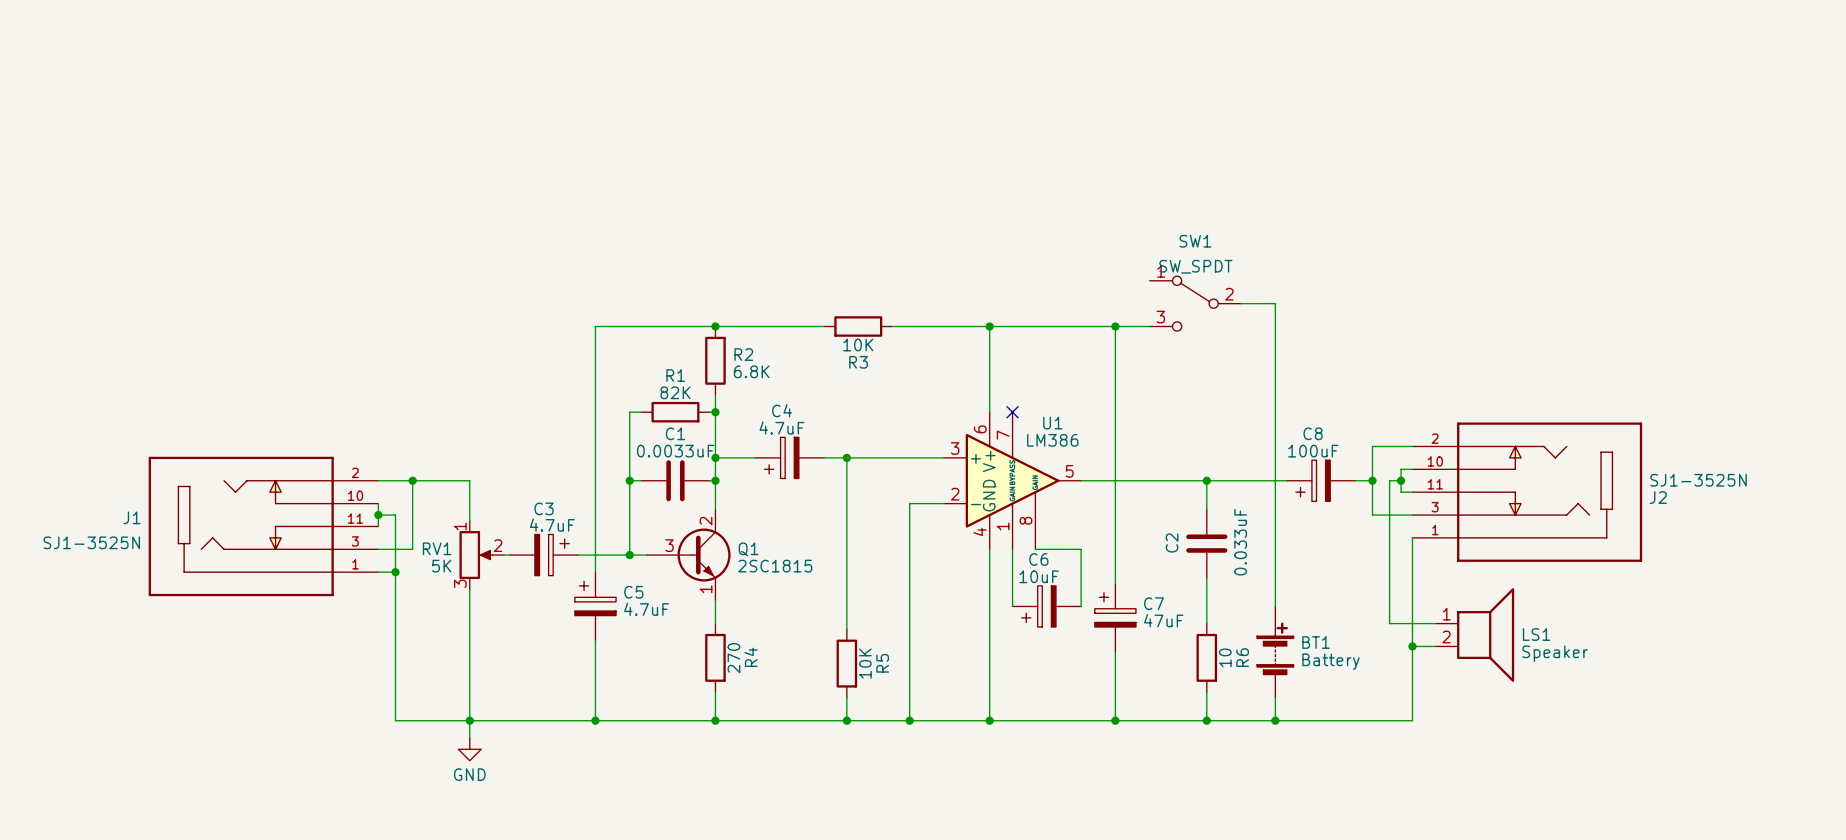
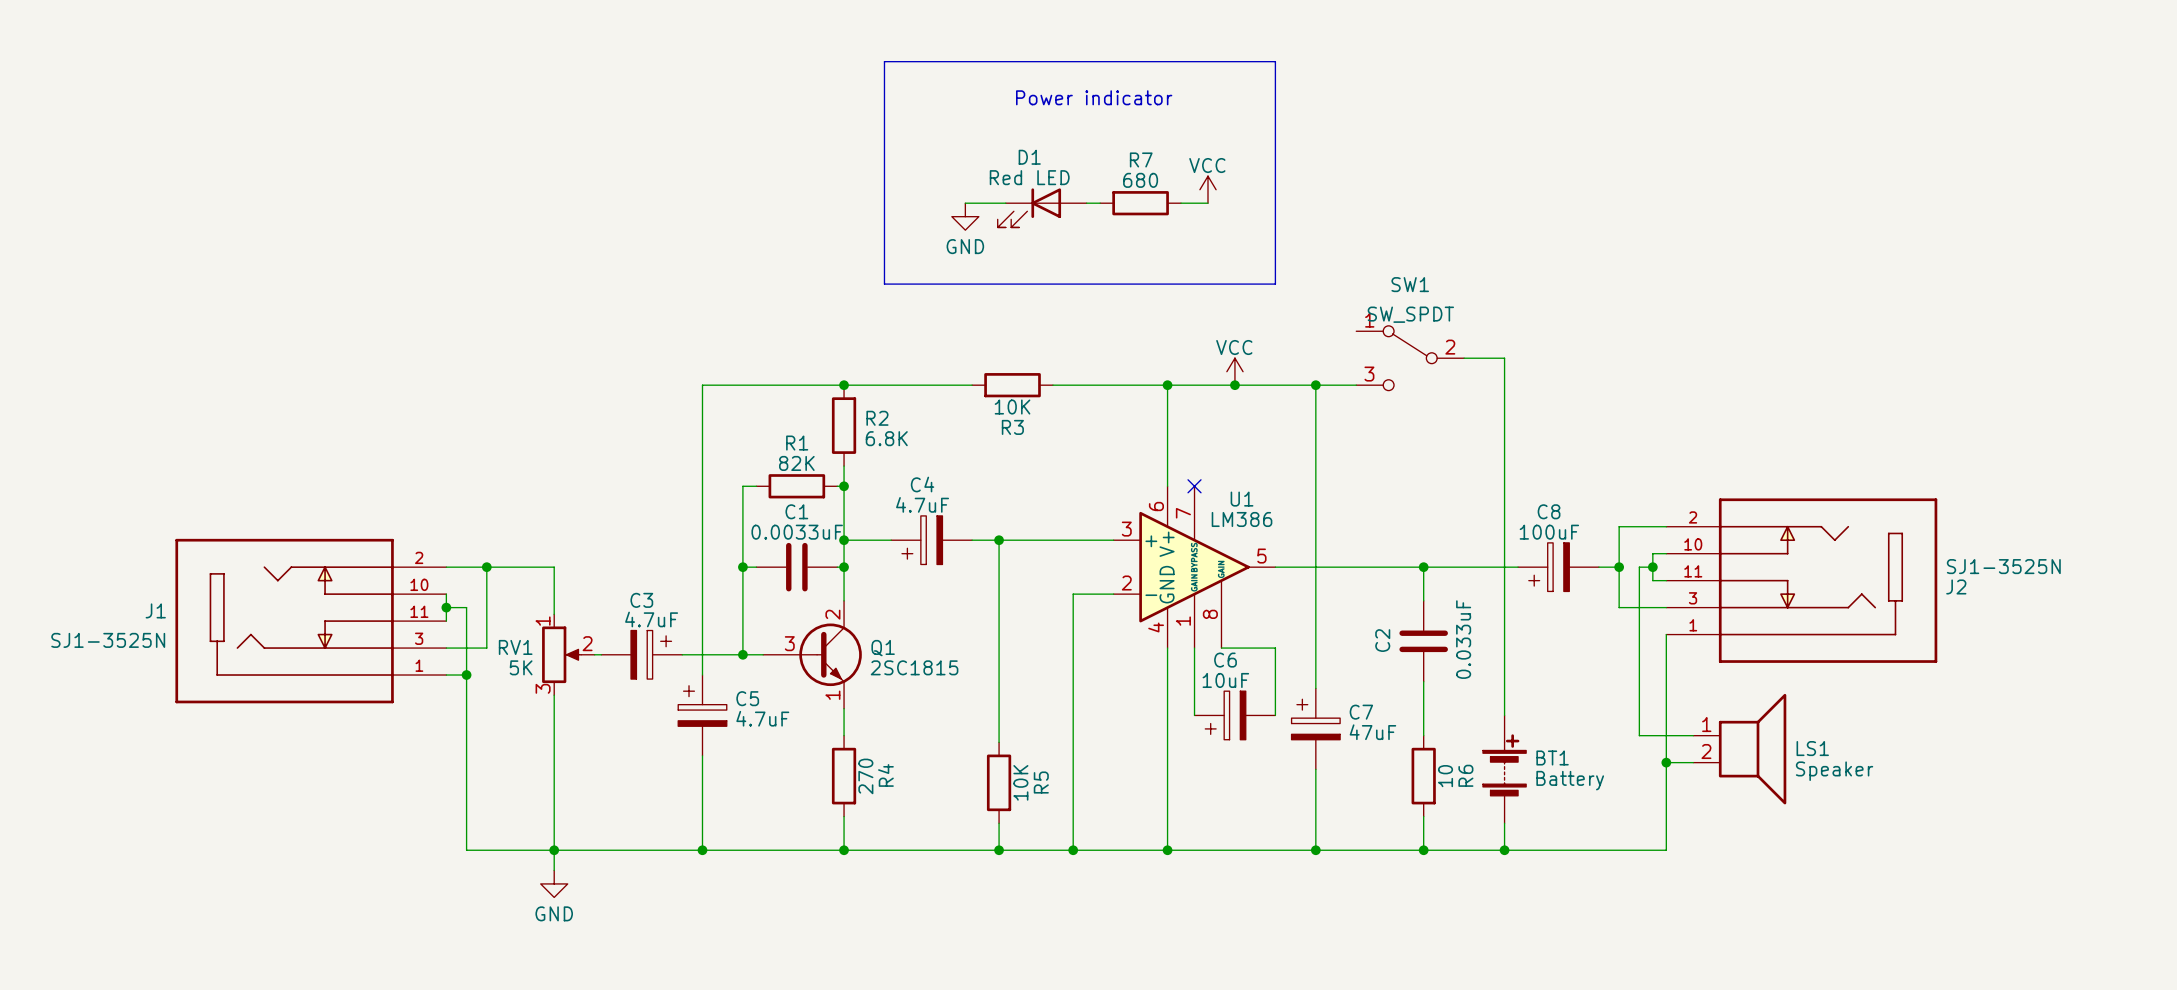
line: none -> (884, 61) (1275, 61) (1275, 284) (884, 284) (884, 61)
text: none -> Power indicator (1094, 97)
power symbol: none -> VCC (1208, 189)
wire: none -> (965, 203) (1005, 203)
wire: none -> (1086, 203) (1100, 203)
R7: none -> 680 (1140, 203)
wire: none -> (1181, 203) (1208, 203)
D1: none -> Red LED (1042, 207)
power symbol: none -> GND (965, 216)
power symbol: none -> VCC (1234, 371)
junction: none -> (1234, 385)

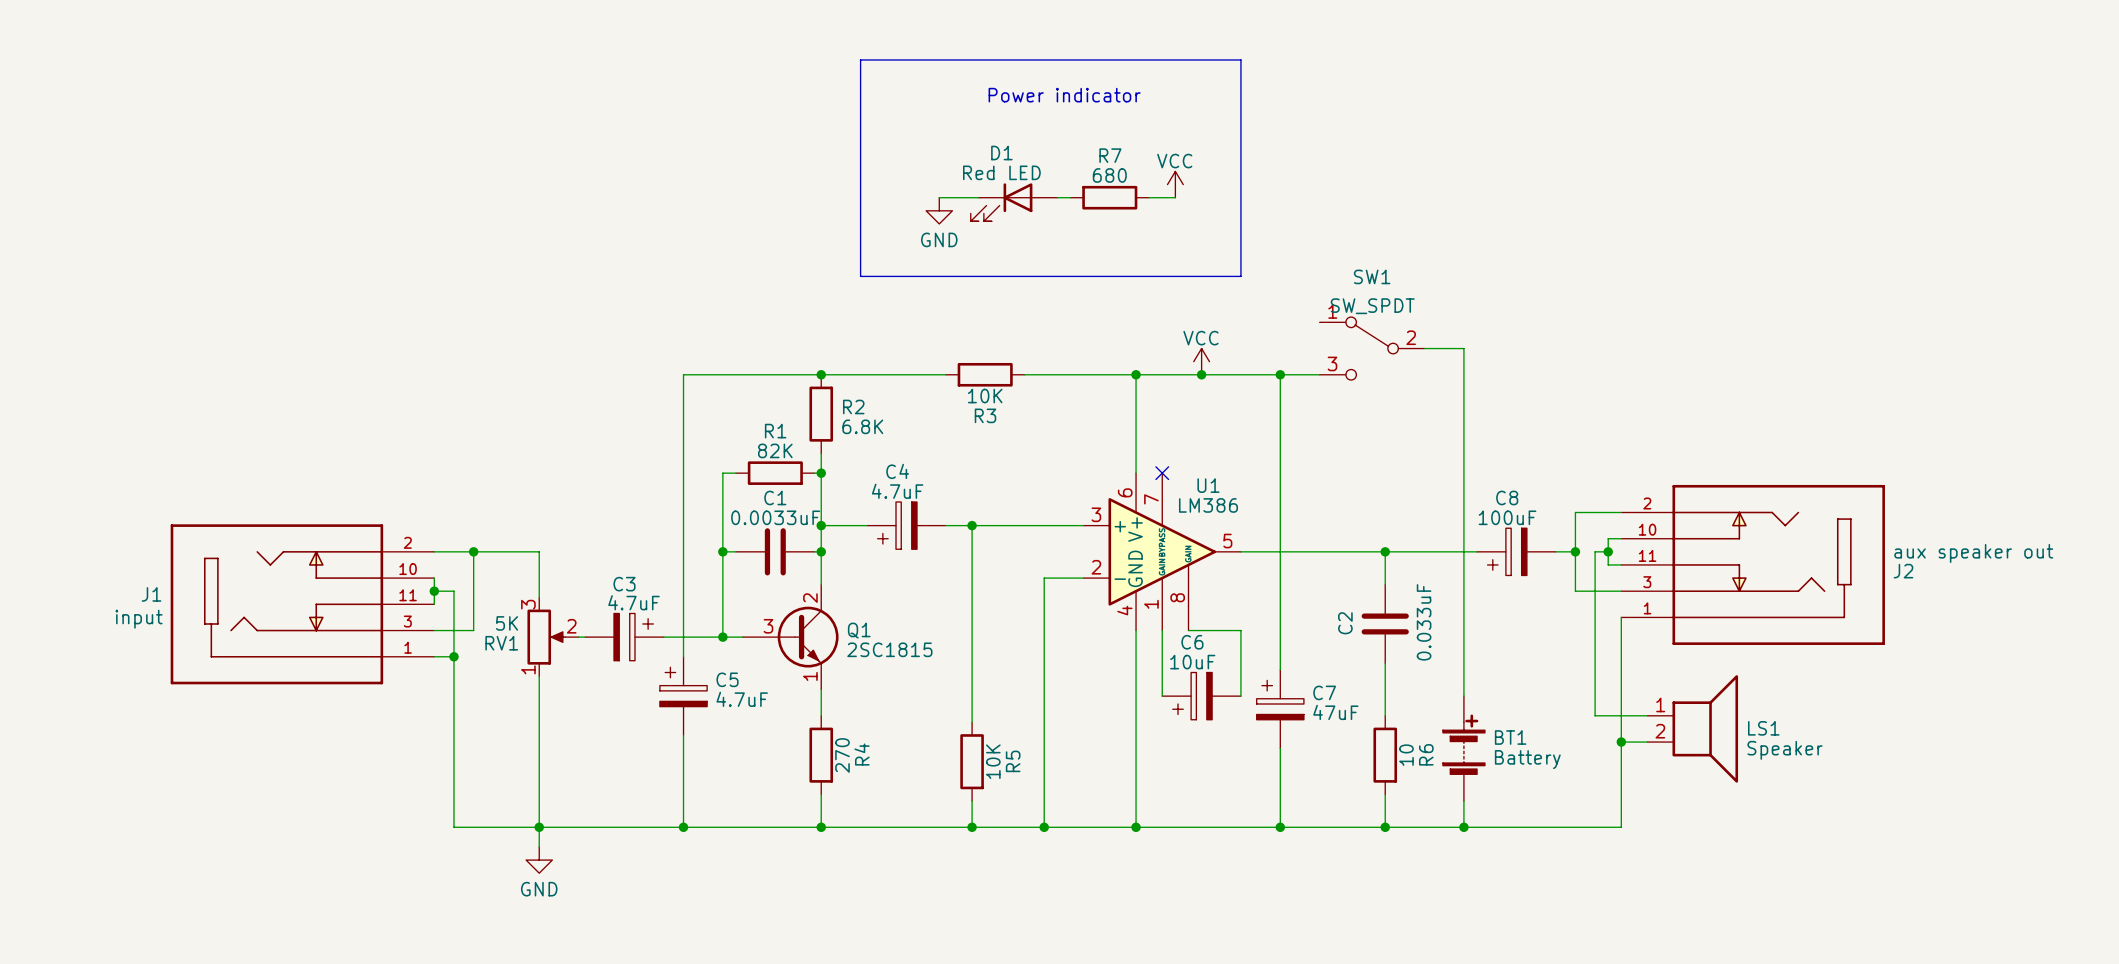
J2 value: SJ1-3525N (2003, 566) -> aux speaker out (1973, 553)
J1 value: SJ1-3525N (108, 640) -> input (139, 619)
RV1 flip: as is (561, 654) -> up-down (546, 637)

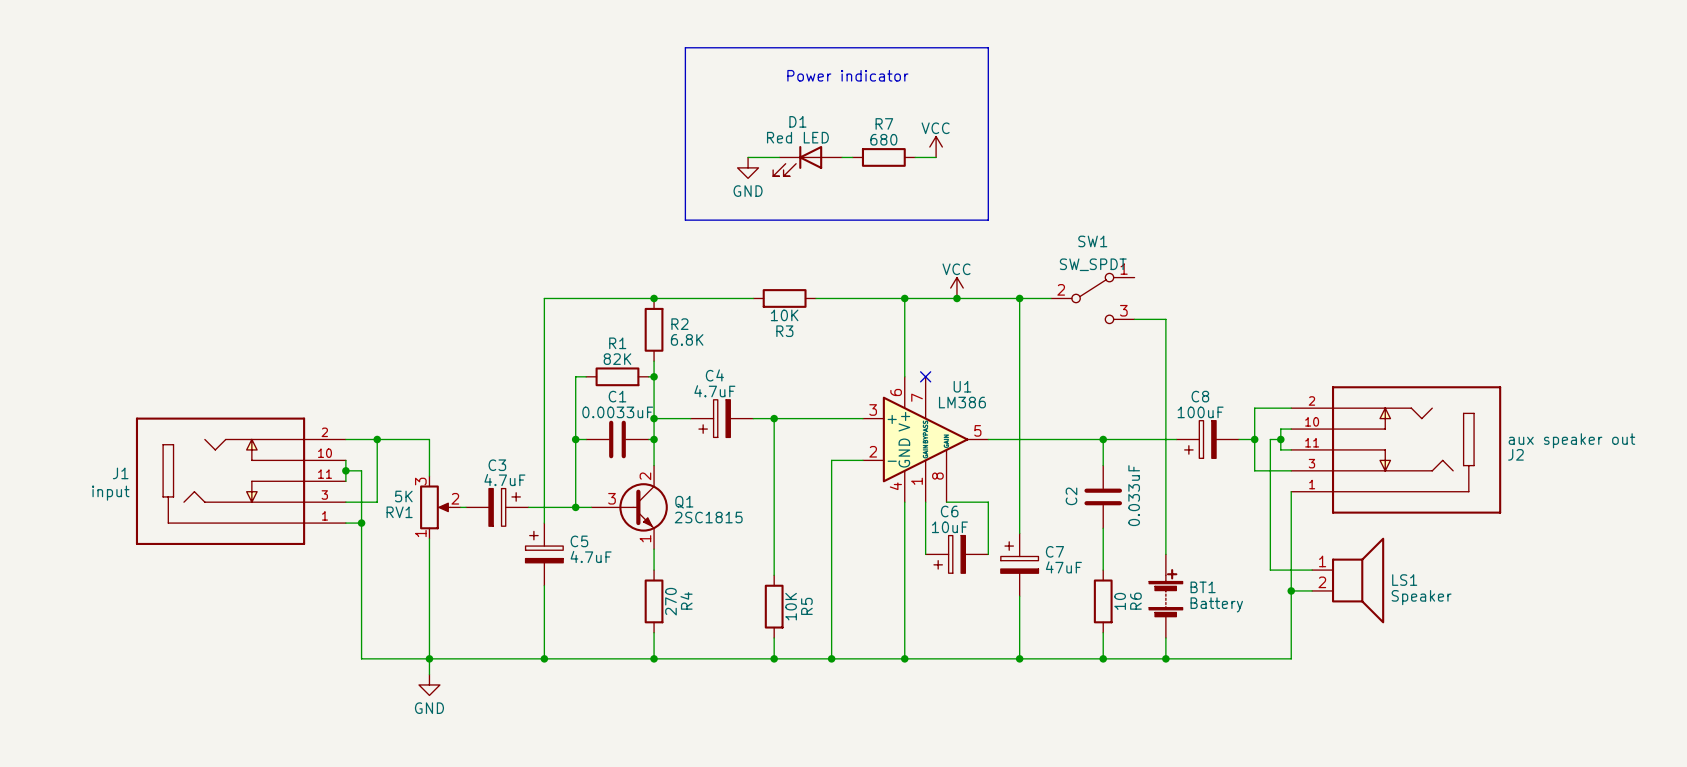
SW1 flip: as is (1372, 348) -> left-right (1092, 298)
wire: (1424, 348) (1463, 348) (1463, 401) -> (1134, 319) (1165, 319)

